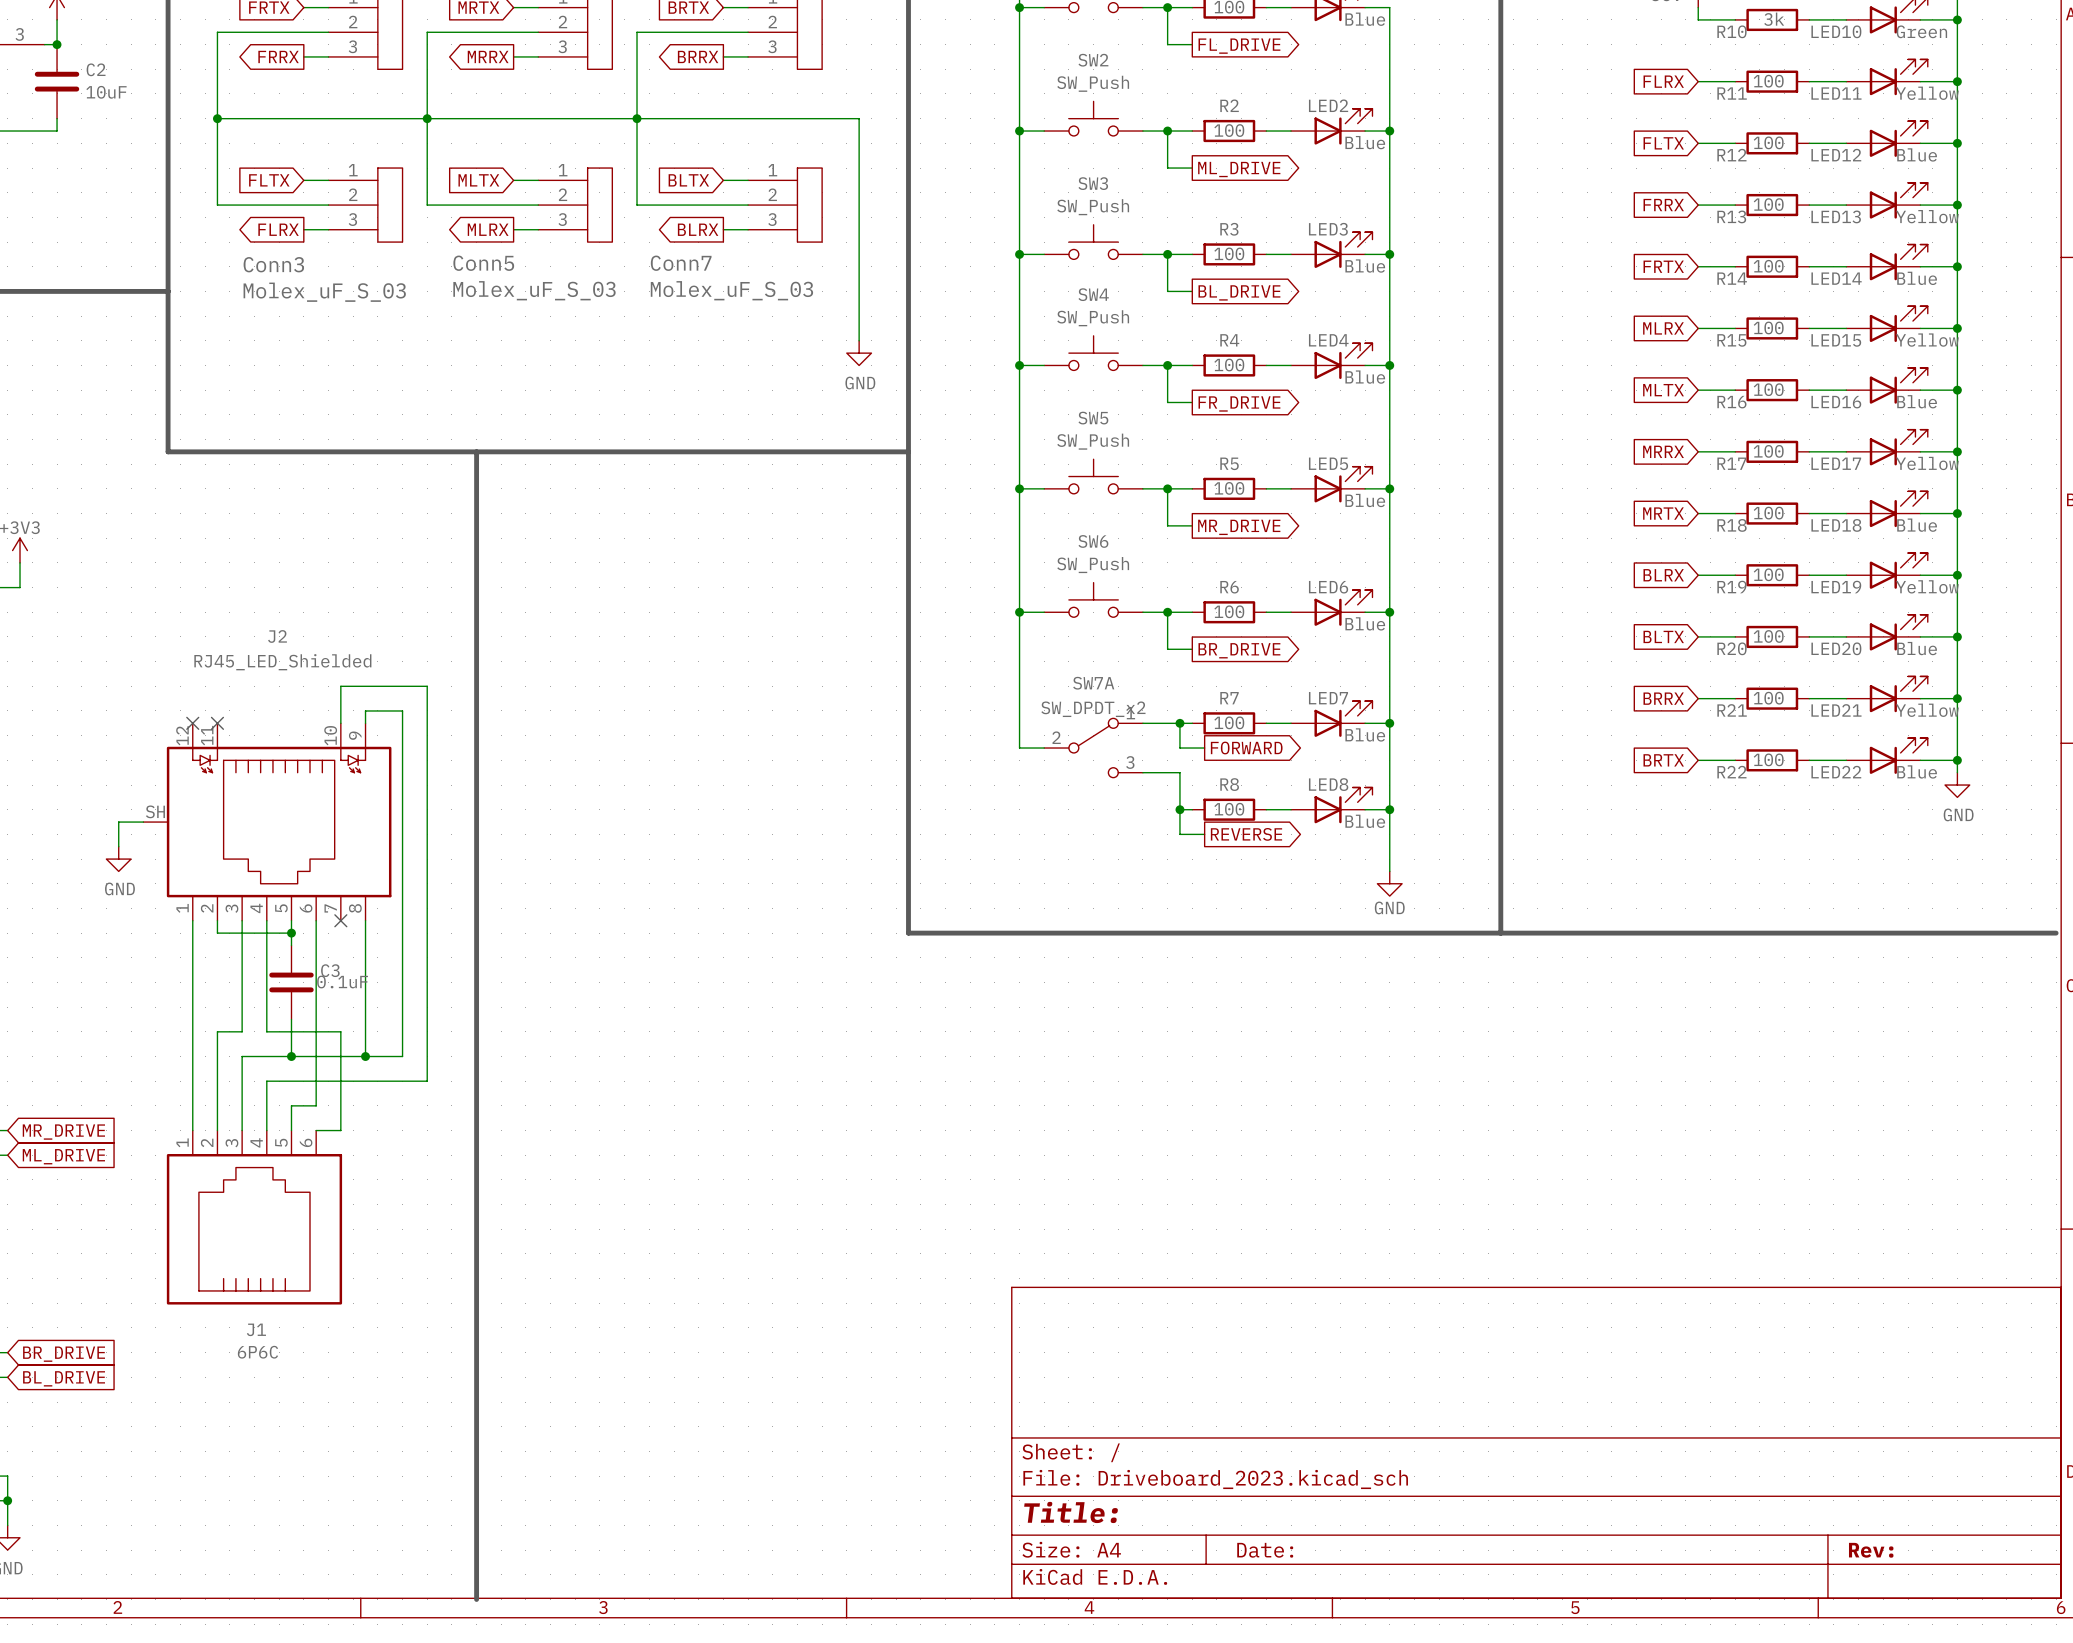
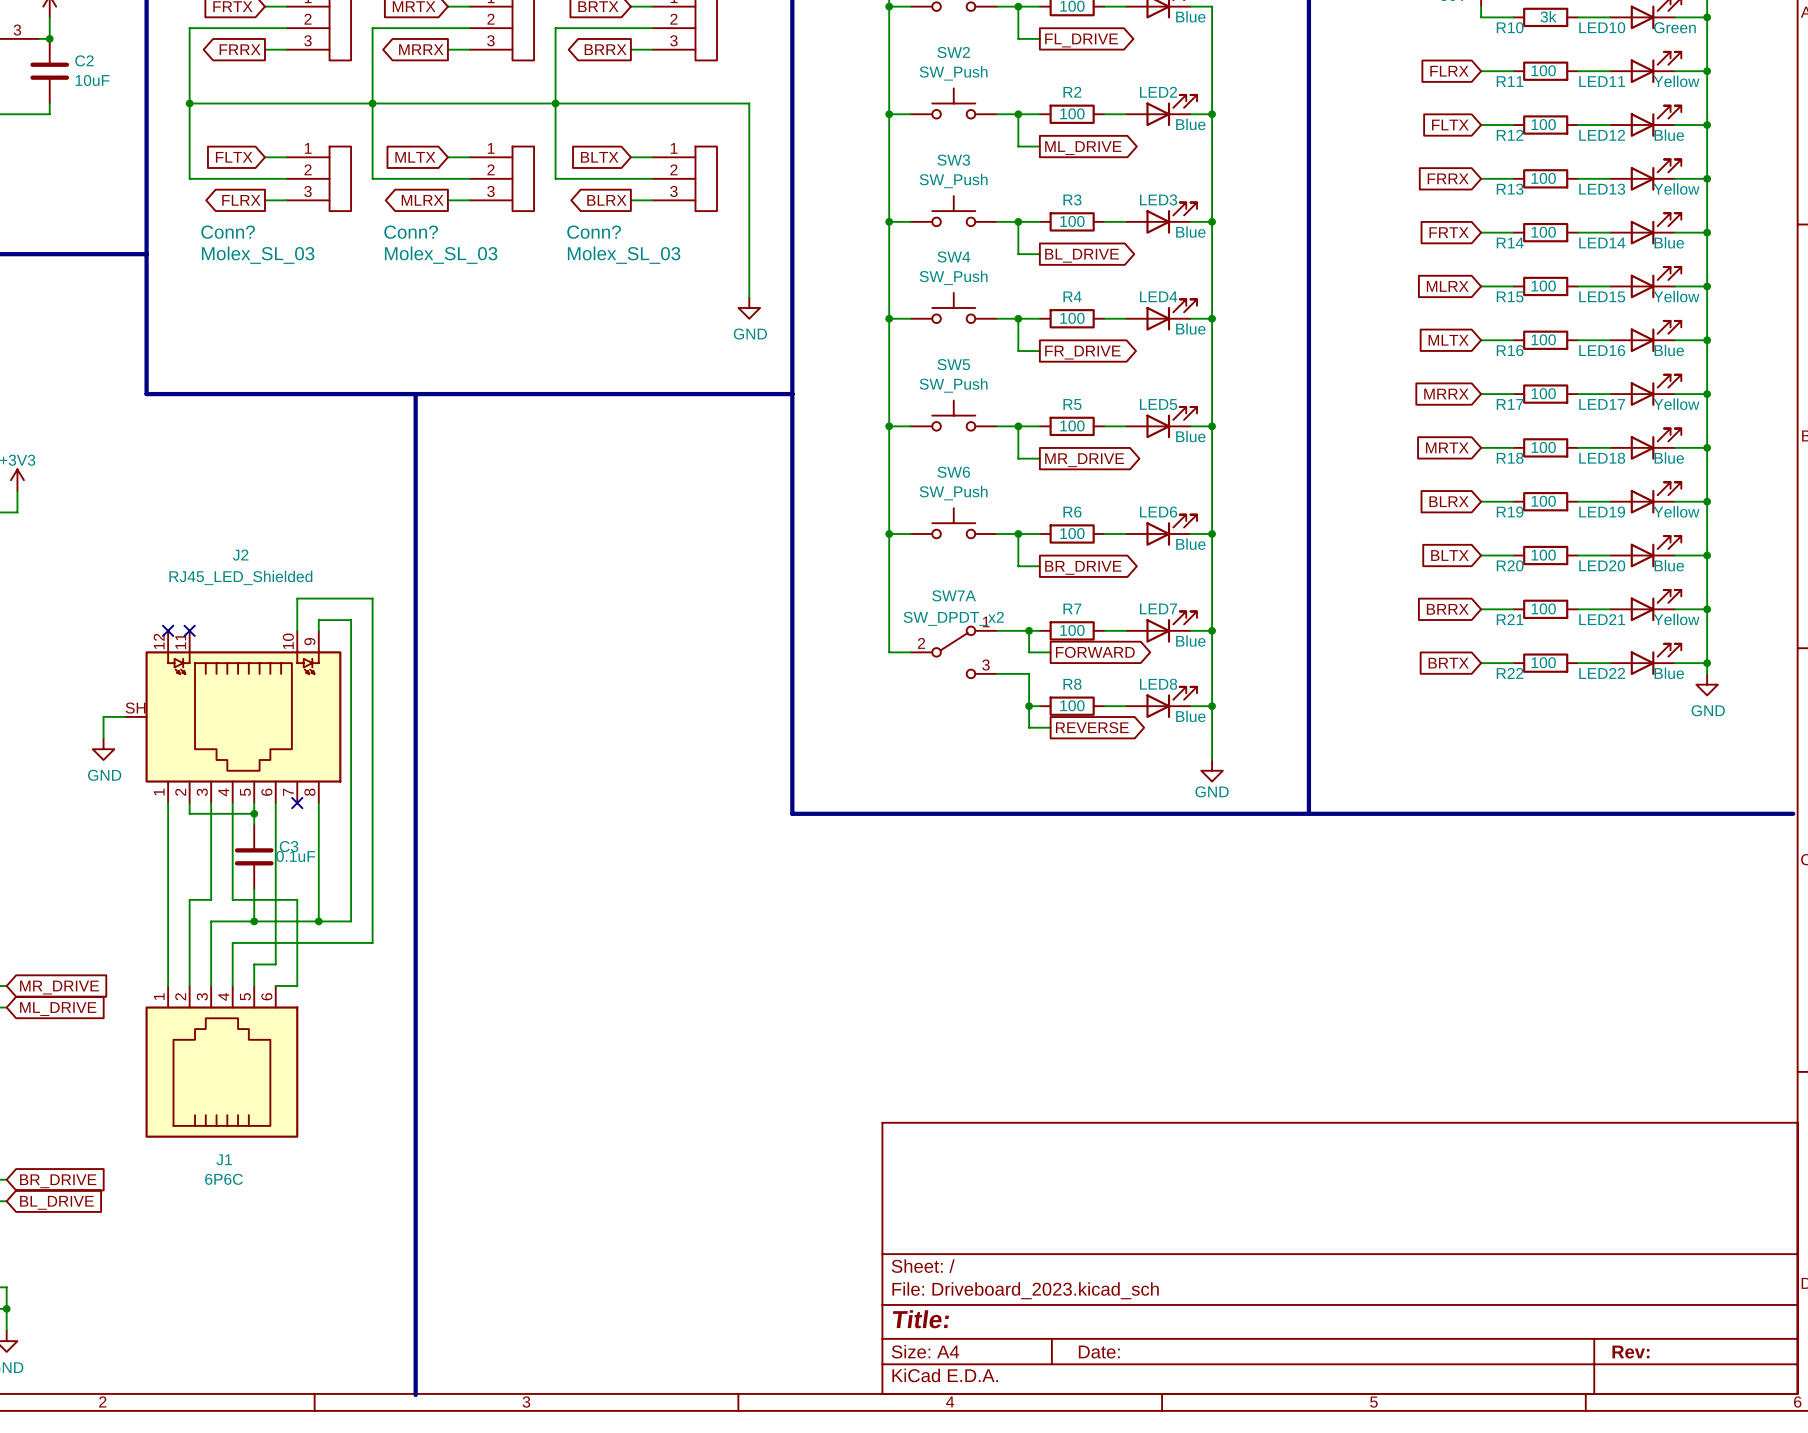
Conn5 name: Conn5 (483, 263) -> Conn? (411, 232)
Conn7 name: Conn7 (681, 263) -> Conn? (594, 232)
Conn3 name: Conn3 (273, 264) -> Conn? (228, 232)
Conn5 value: Molex_uF_S_03 (534, 290) -> Molex_SL_03 (441, 255)
Conn7 value: Molex_uF_S_03 (731, 290) -> Molex_SL_03 (624, 255)
Conn3 value: Molex_uF_S_03 (324, 292) -> Molex_SL_03 (258, 255)

